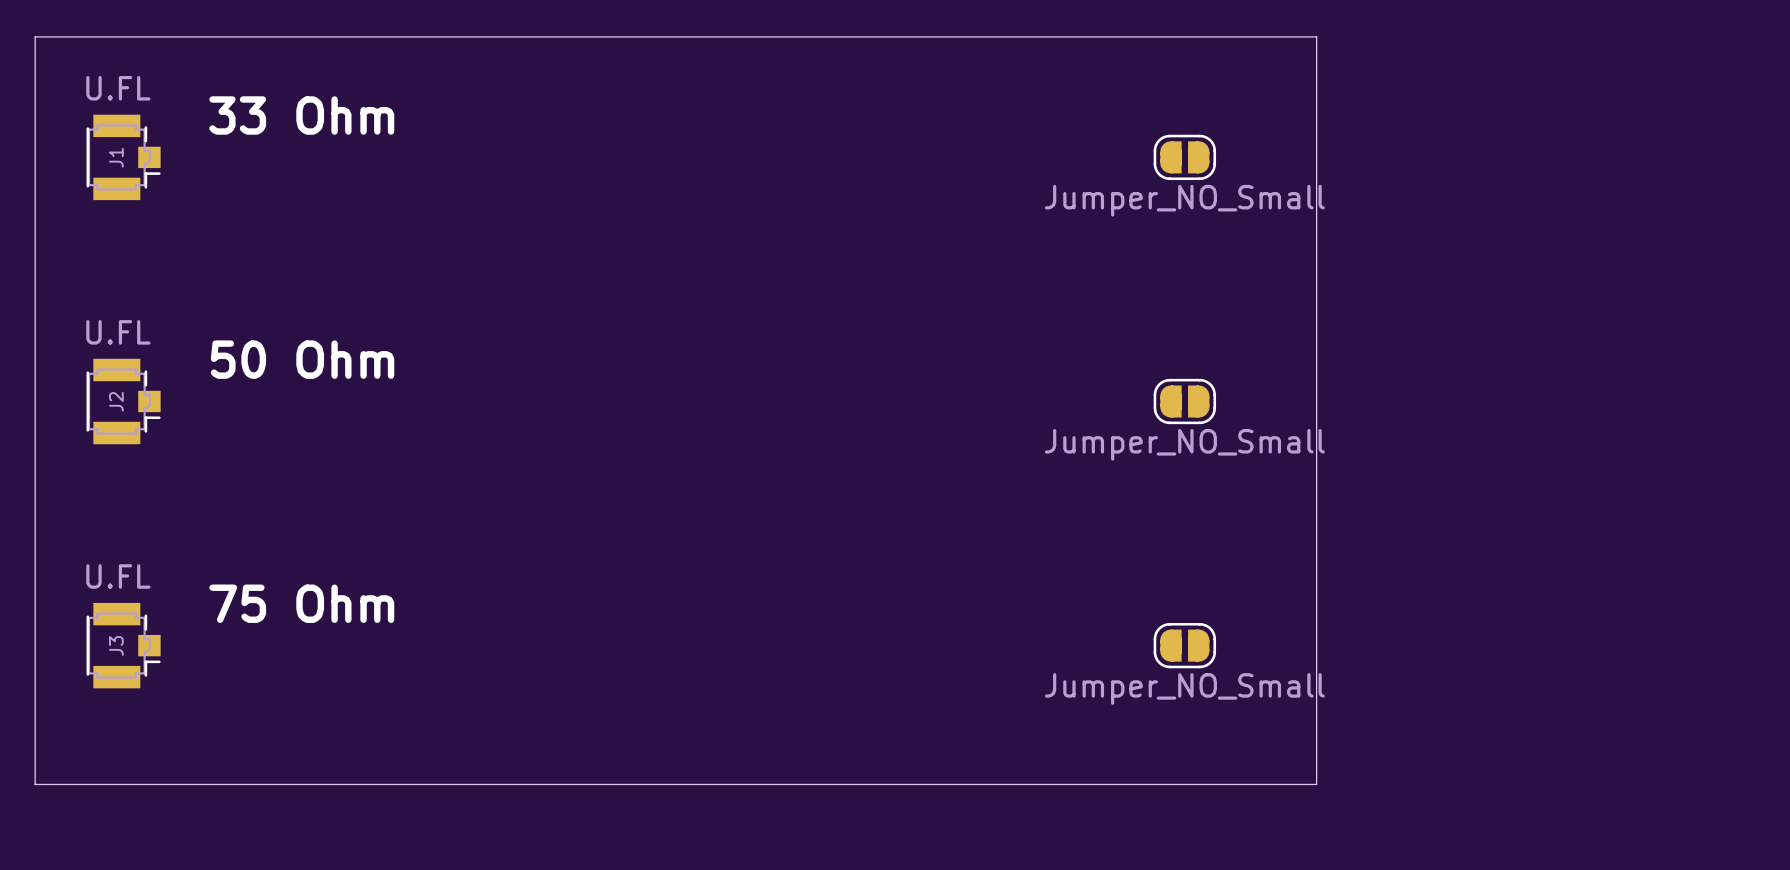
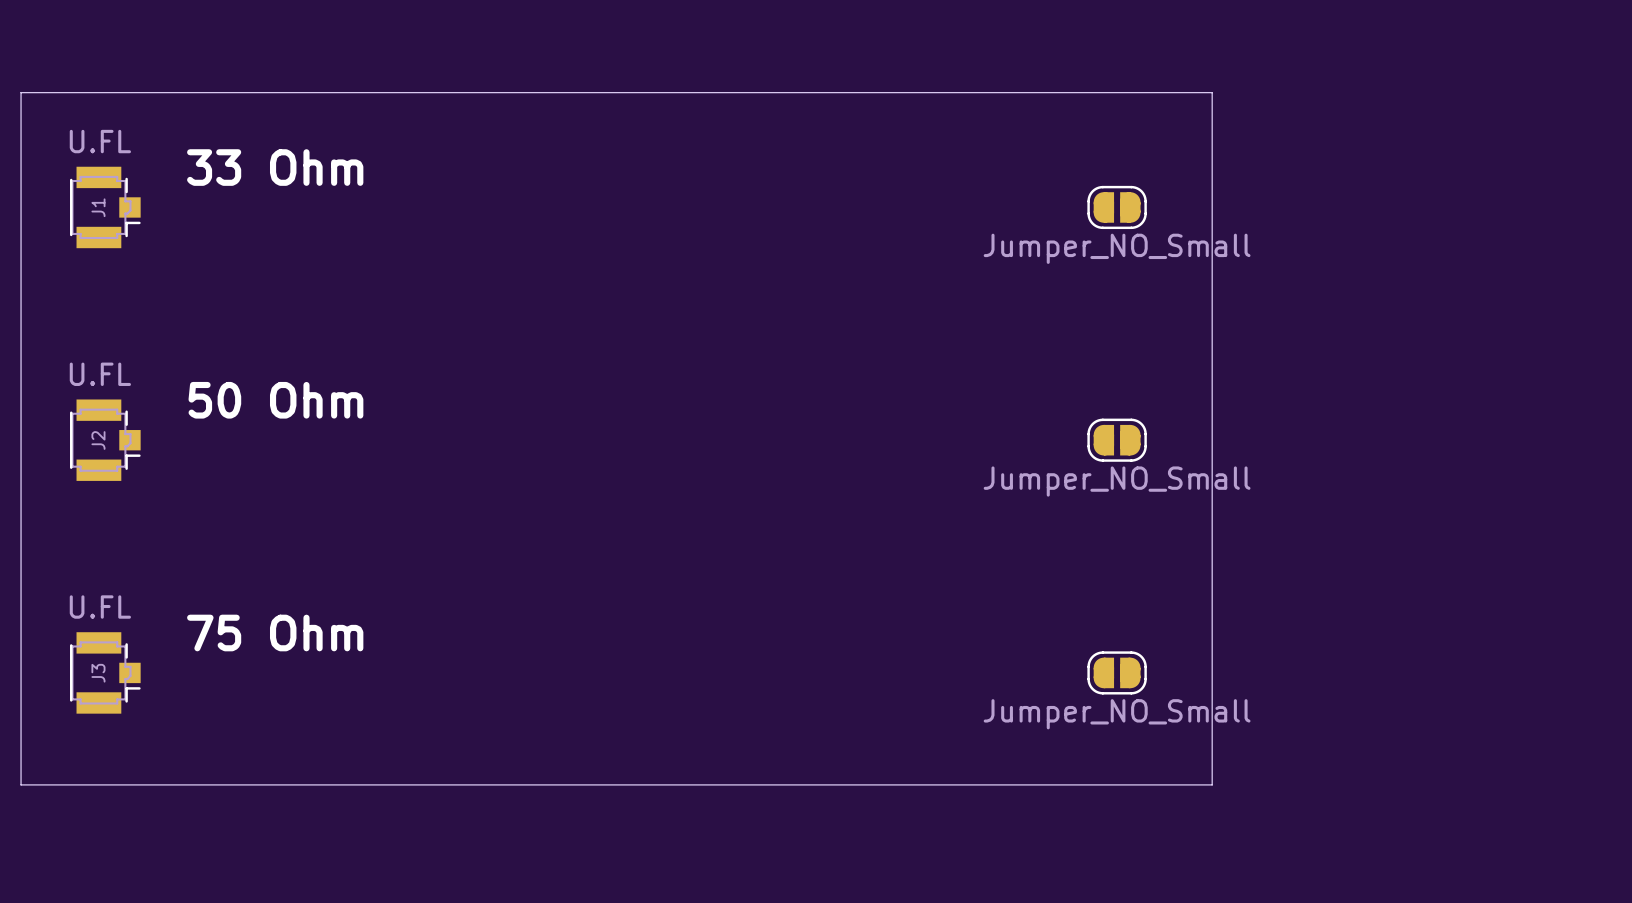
board edge: (1284, 36) (1316, 36) (1316, 784) (35, 784) (35, 763) -> (1212, 92) (1212, 784) (21, 784)

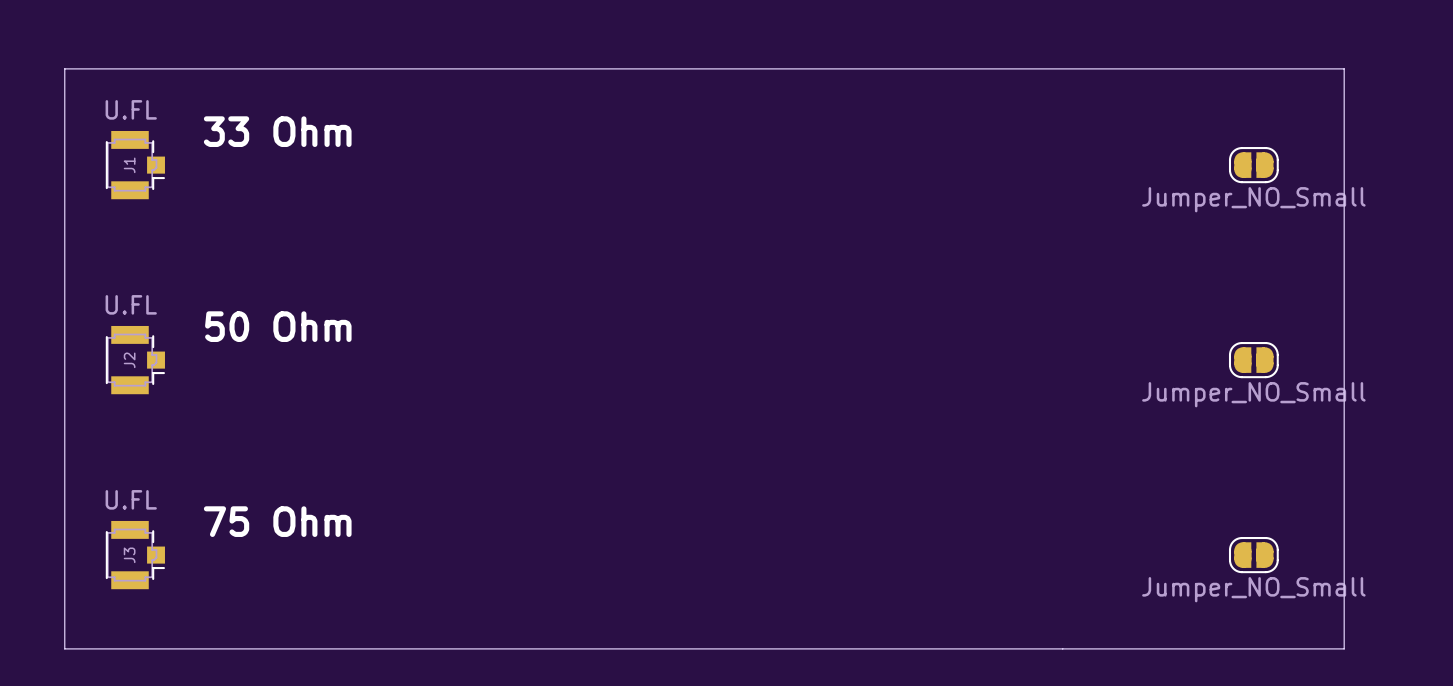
board edge: (1212, 92) (1212, 784) -> (1062, 68) (1344, 68) (1344, 648) (1062, 648)
part: Jumper_NO_Small (1117, 207) -> none
part: none -> Jumper_NO_Small (1253, 165)
part: Jumper_NO_Small (1117, 440) -> none
part: none -> Jumper_NO_Small (1253, 360)
part: Jumper_NO_Small (1117, 672) -> none
part: none -> Jumper_NO_Small (1253, 555)

